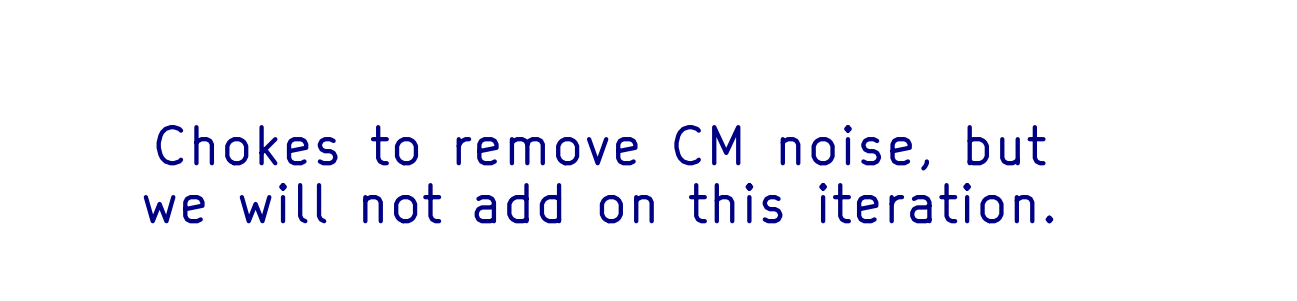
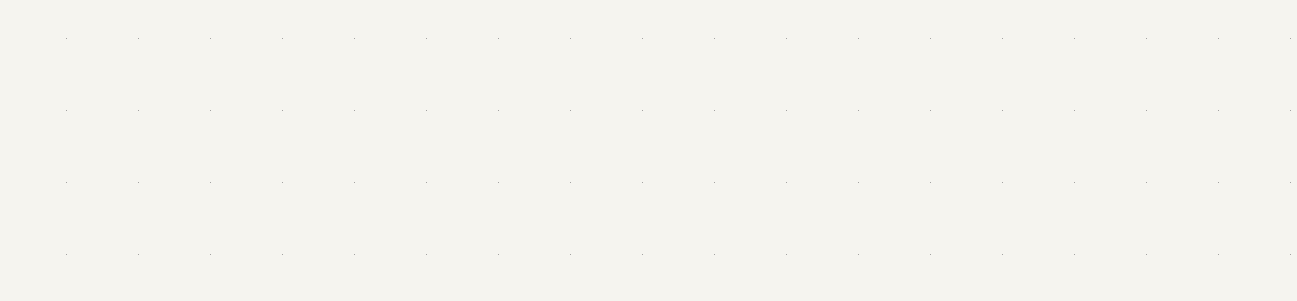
text: Chokes to remove CM noise, but (601, 147) -> none
text: we will not add on this iteration. (598, 203) -> none

